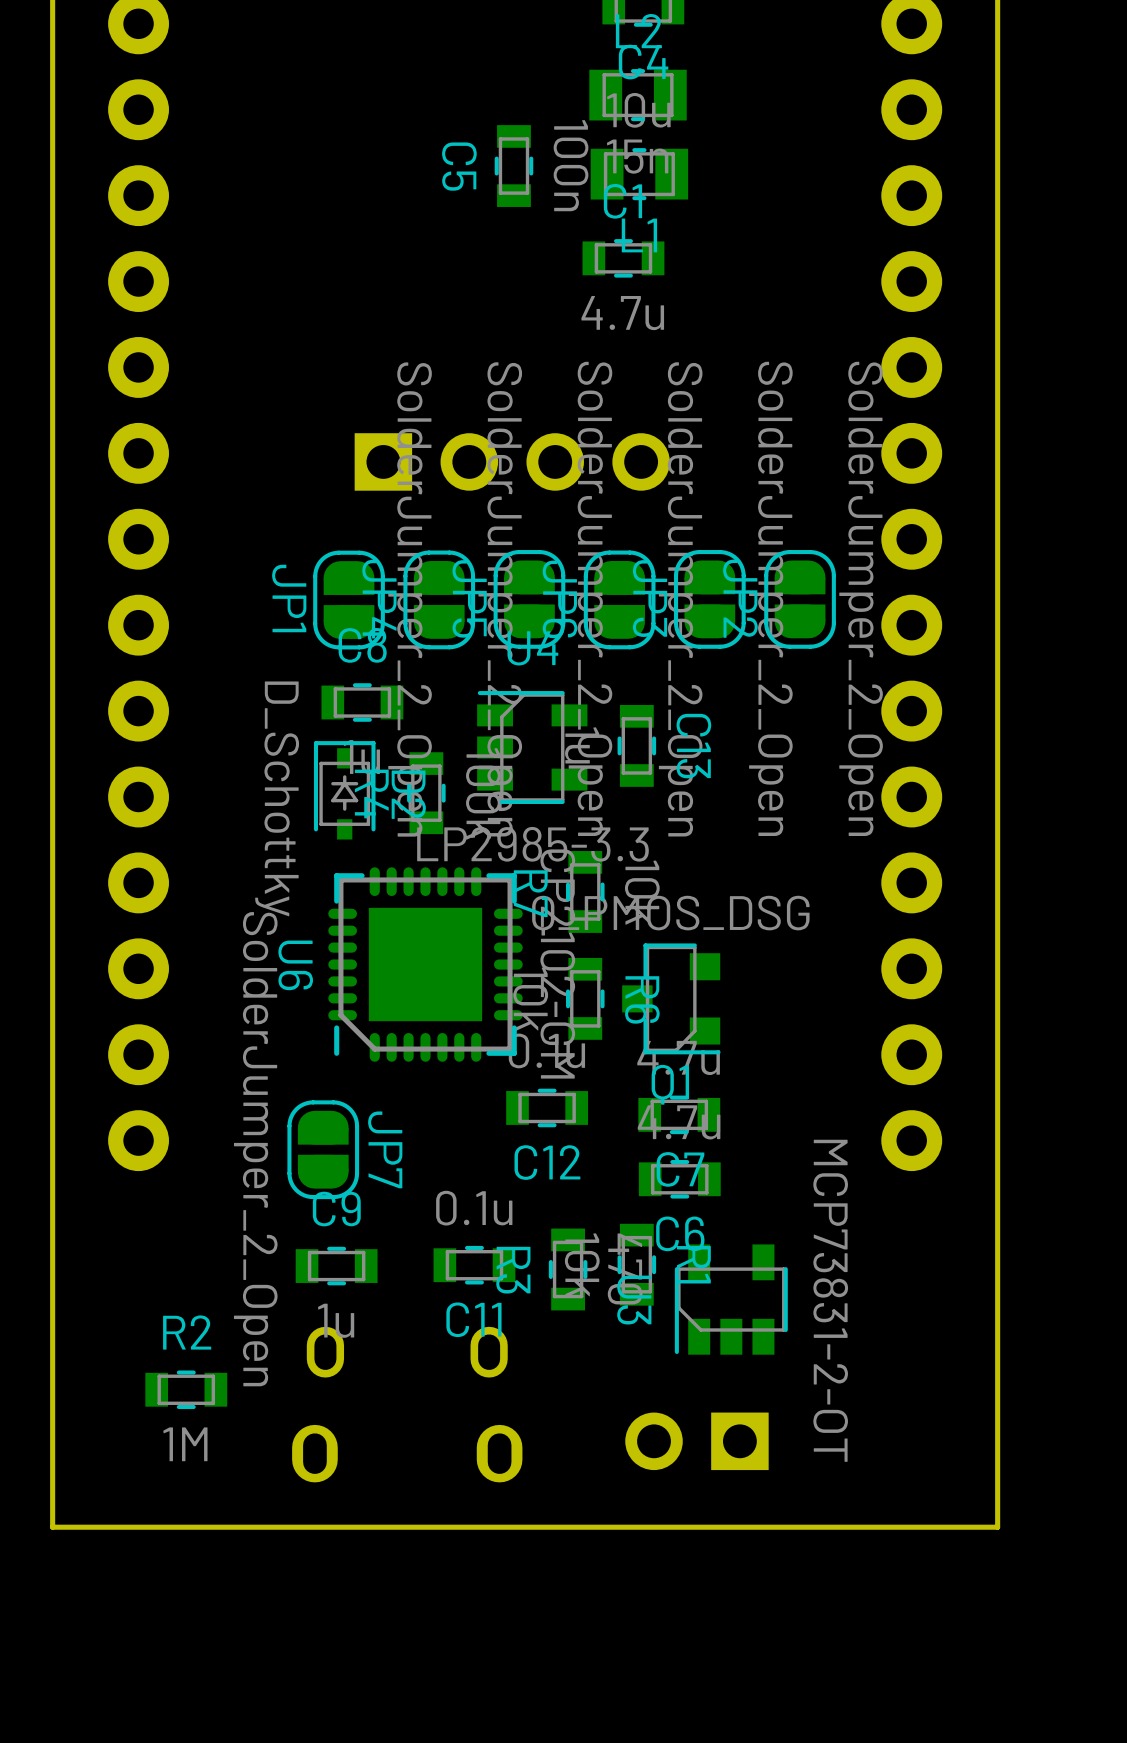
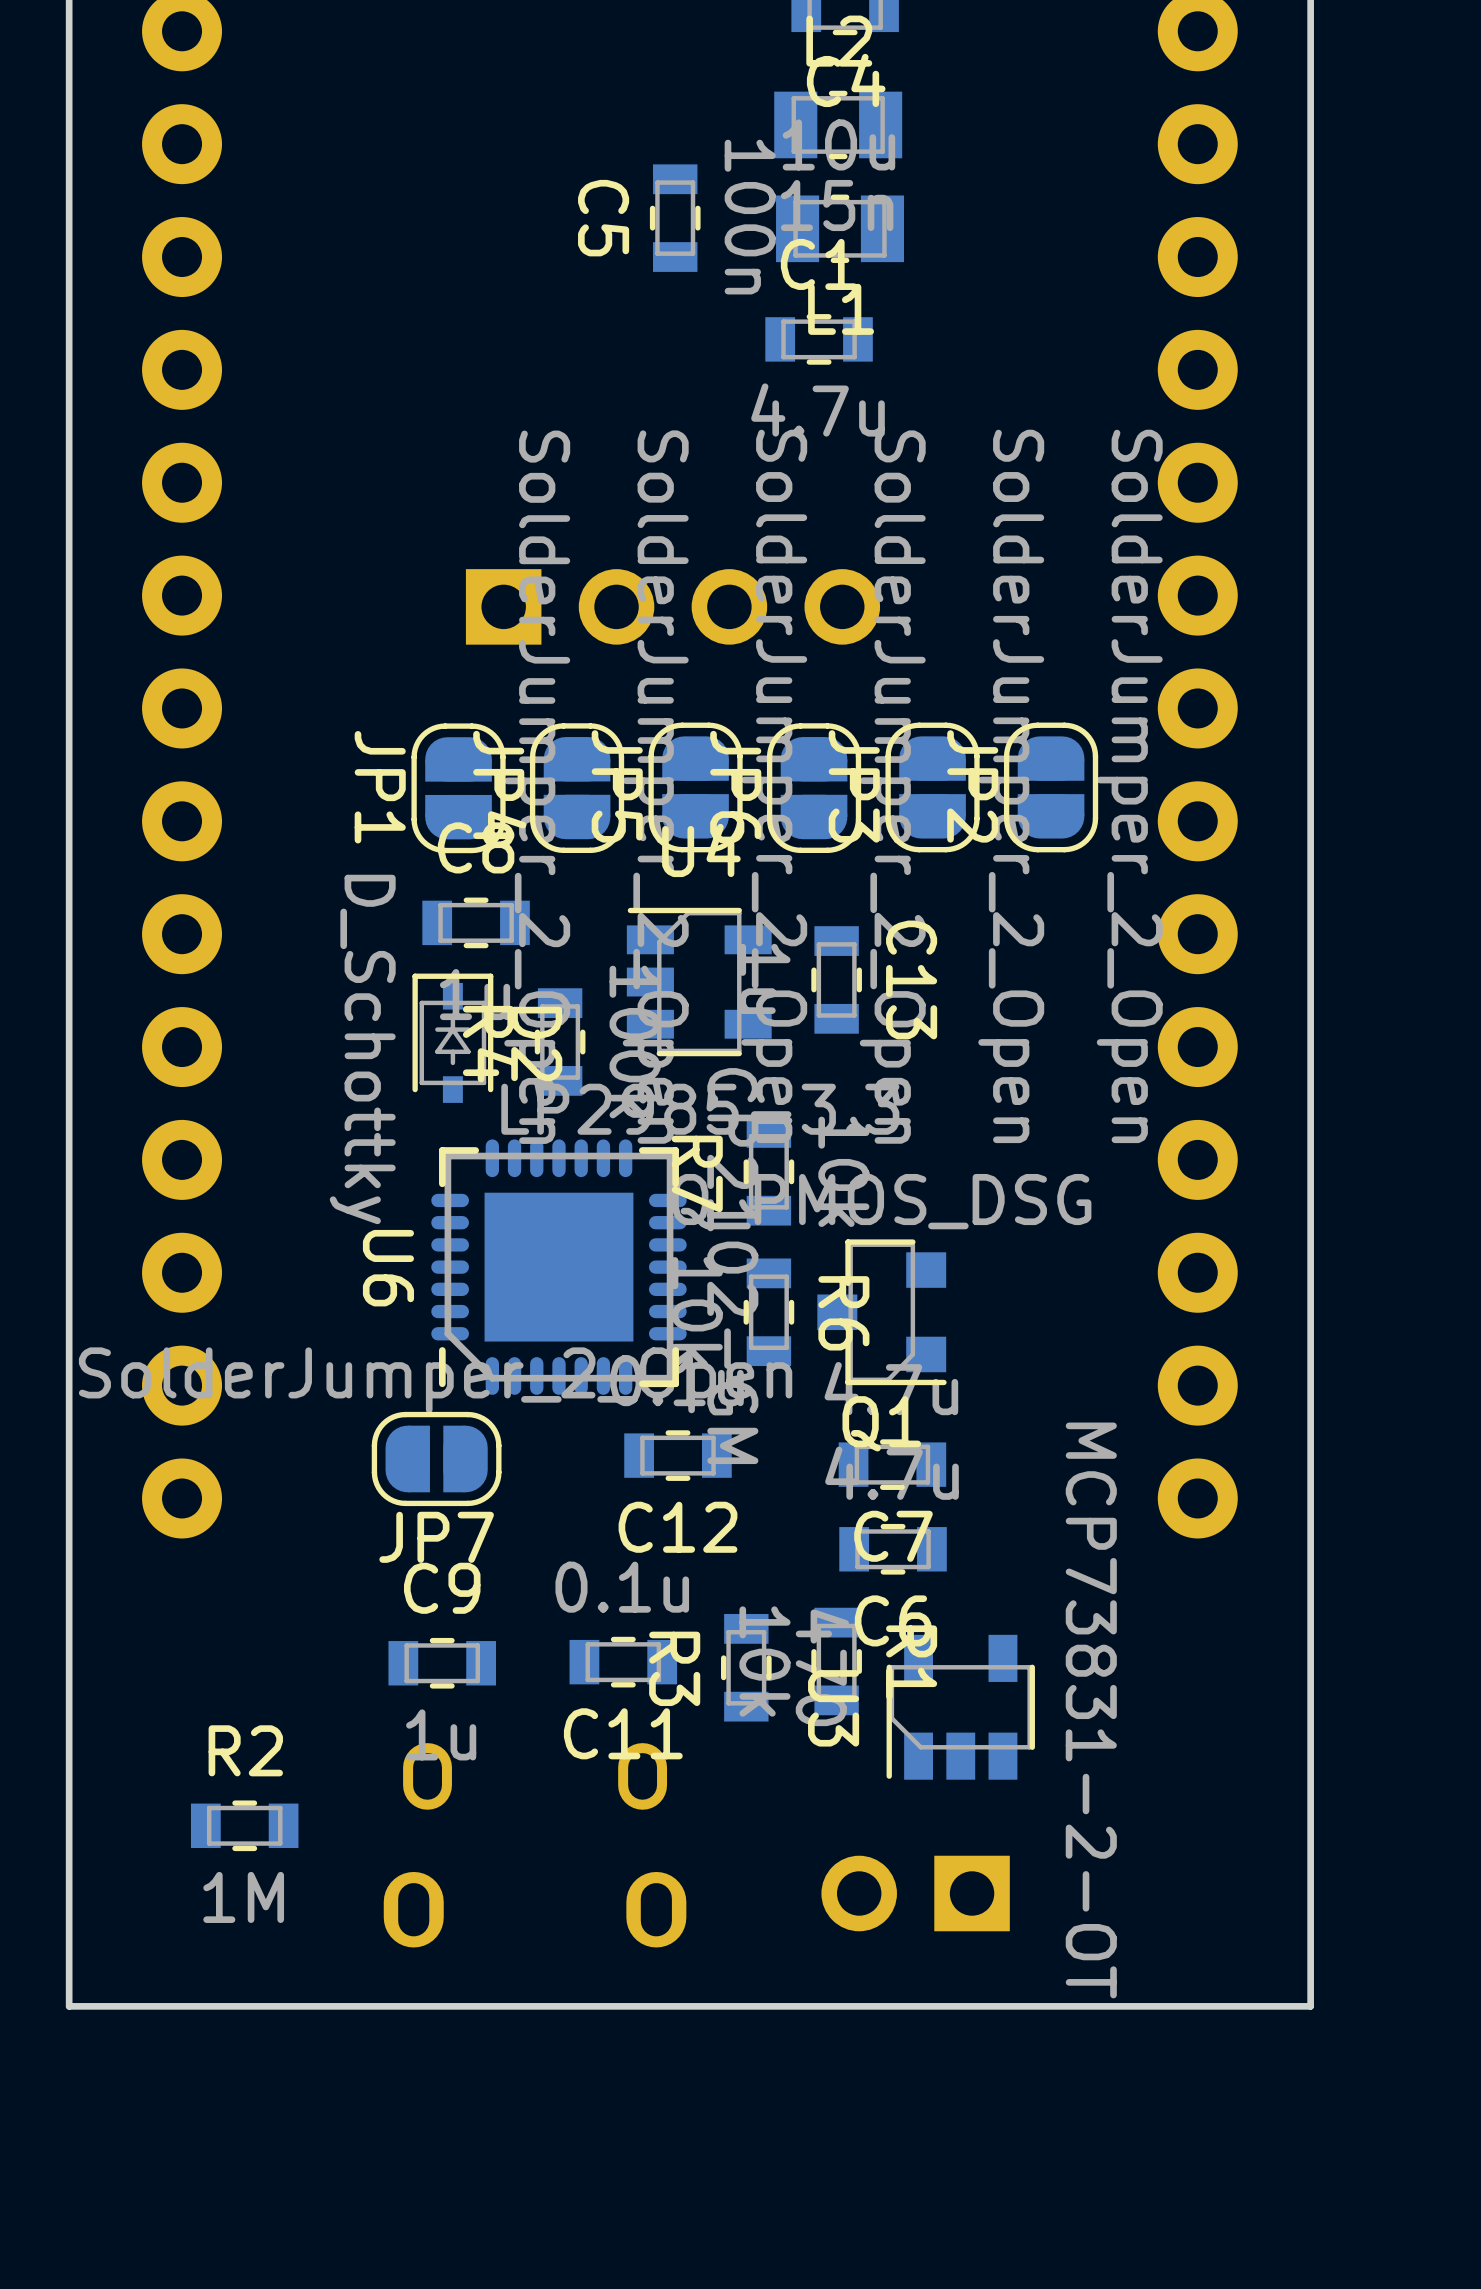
C12 position: (547, 1107) -> (677, 1455)
JP7 rotation: 0° (323, 1149) -> 90° clockwise (436, 1458)

